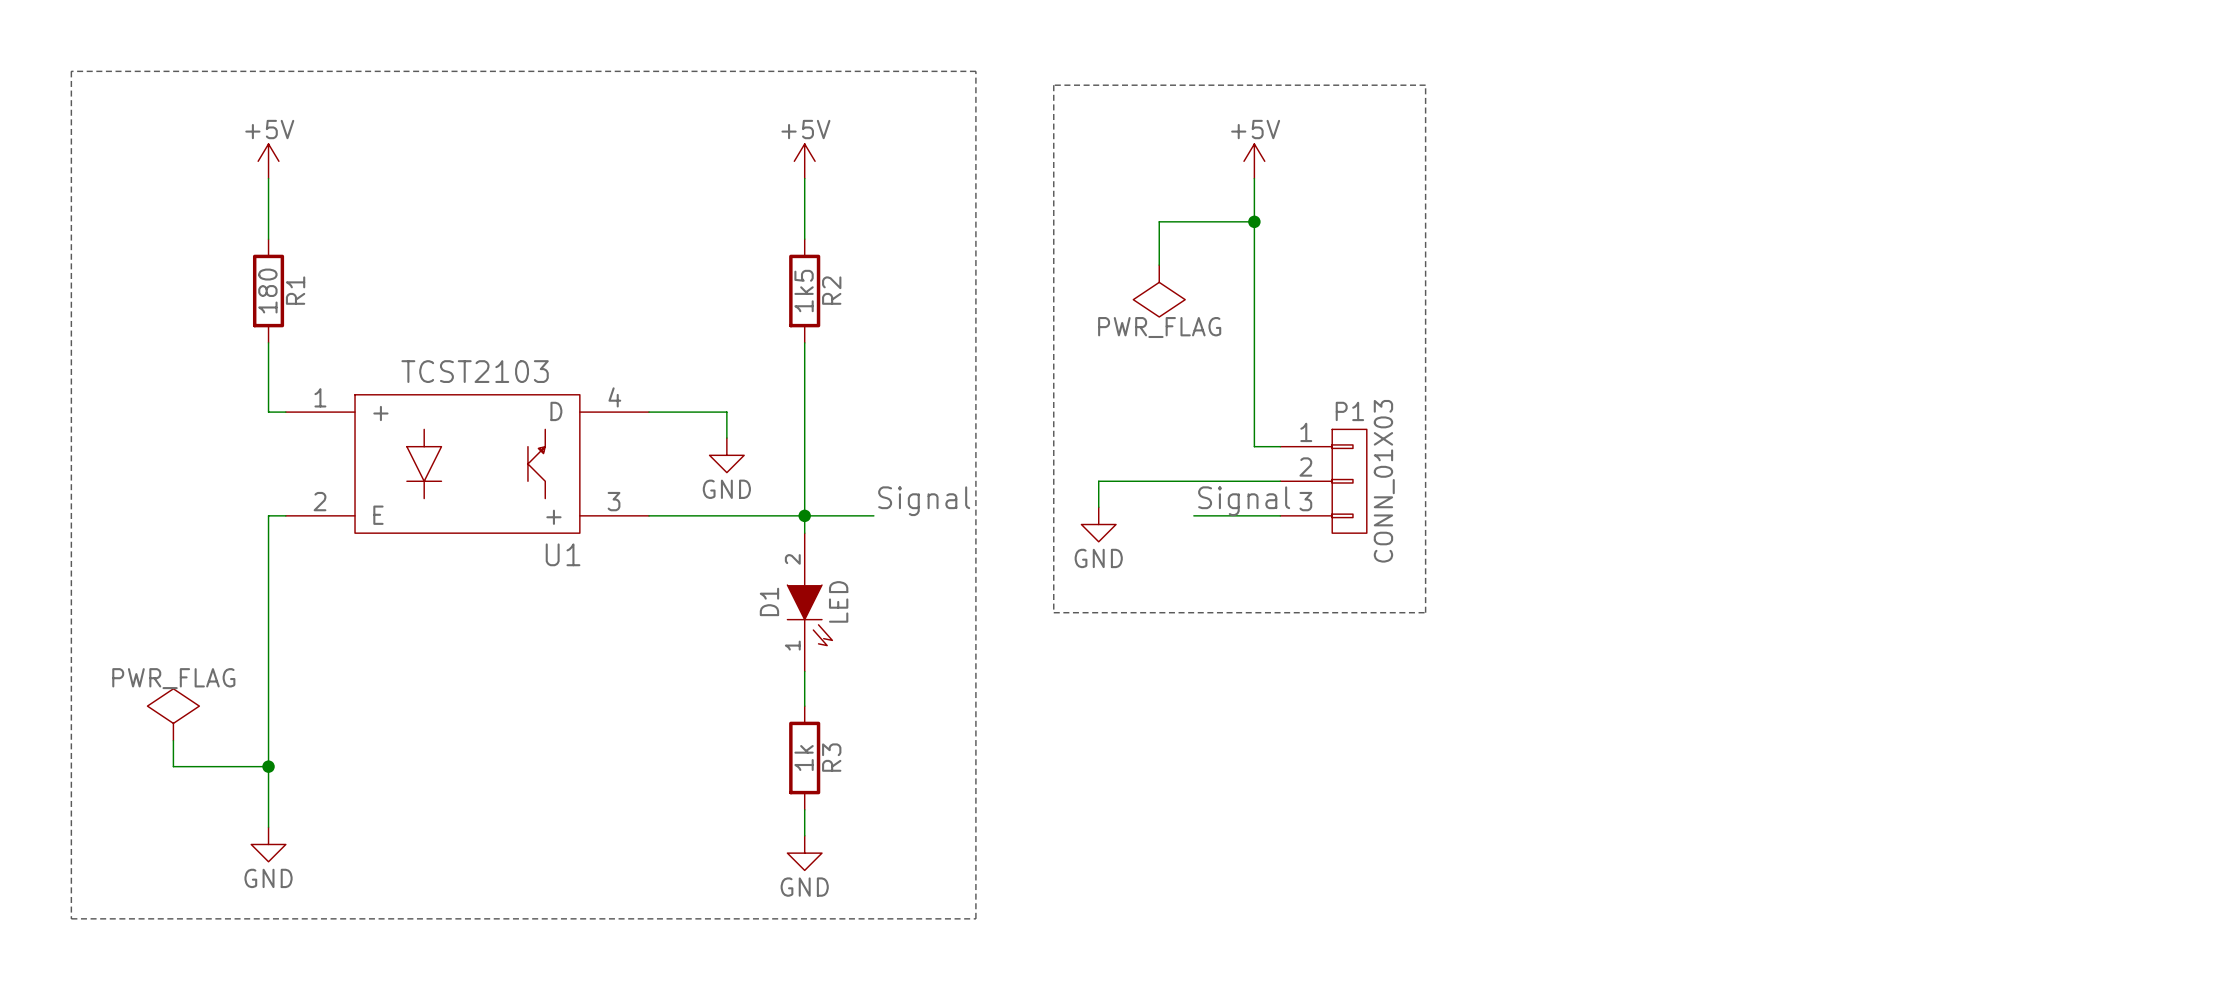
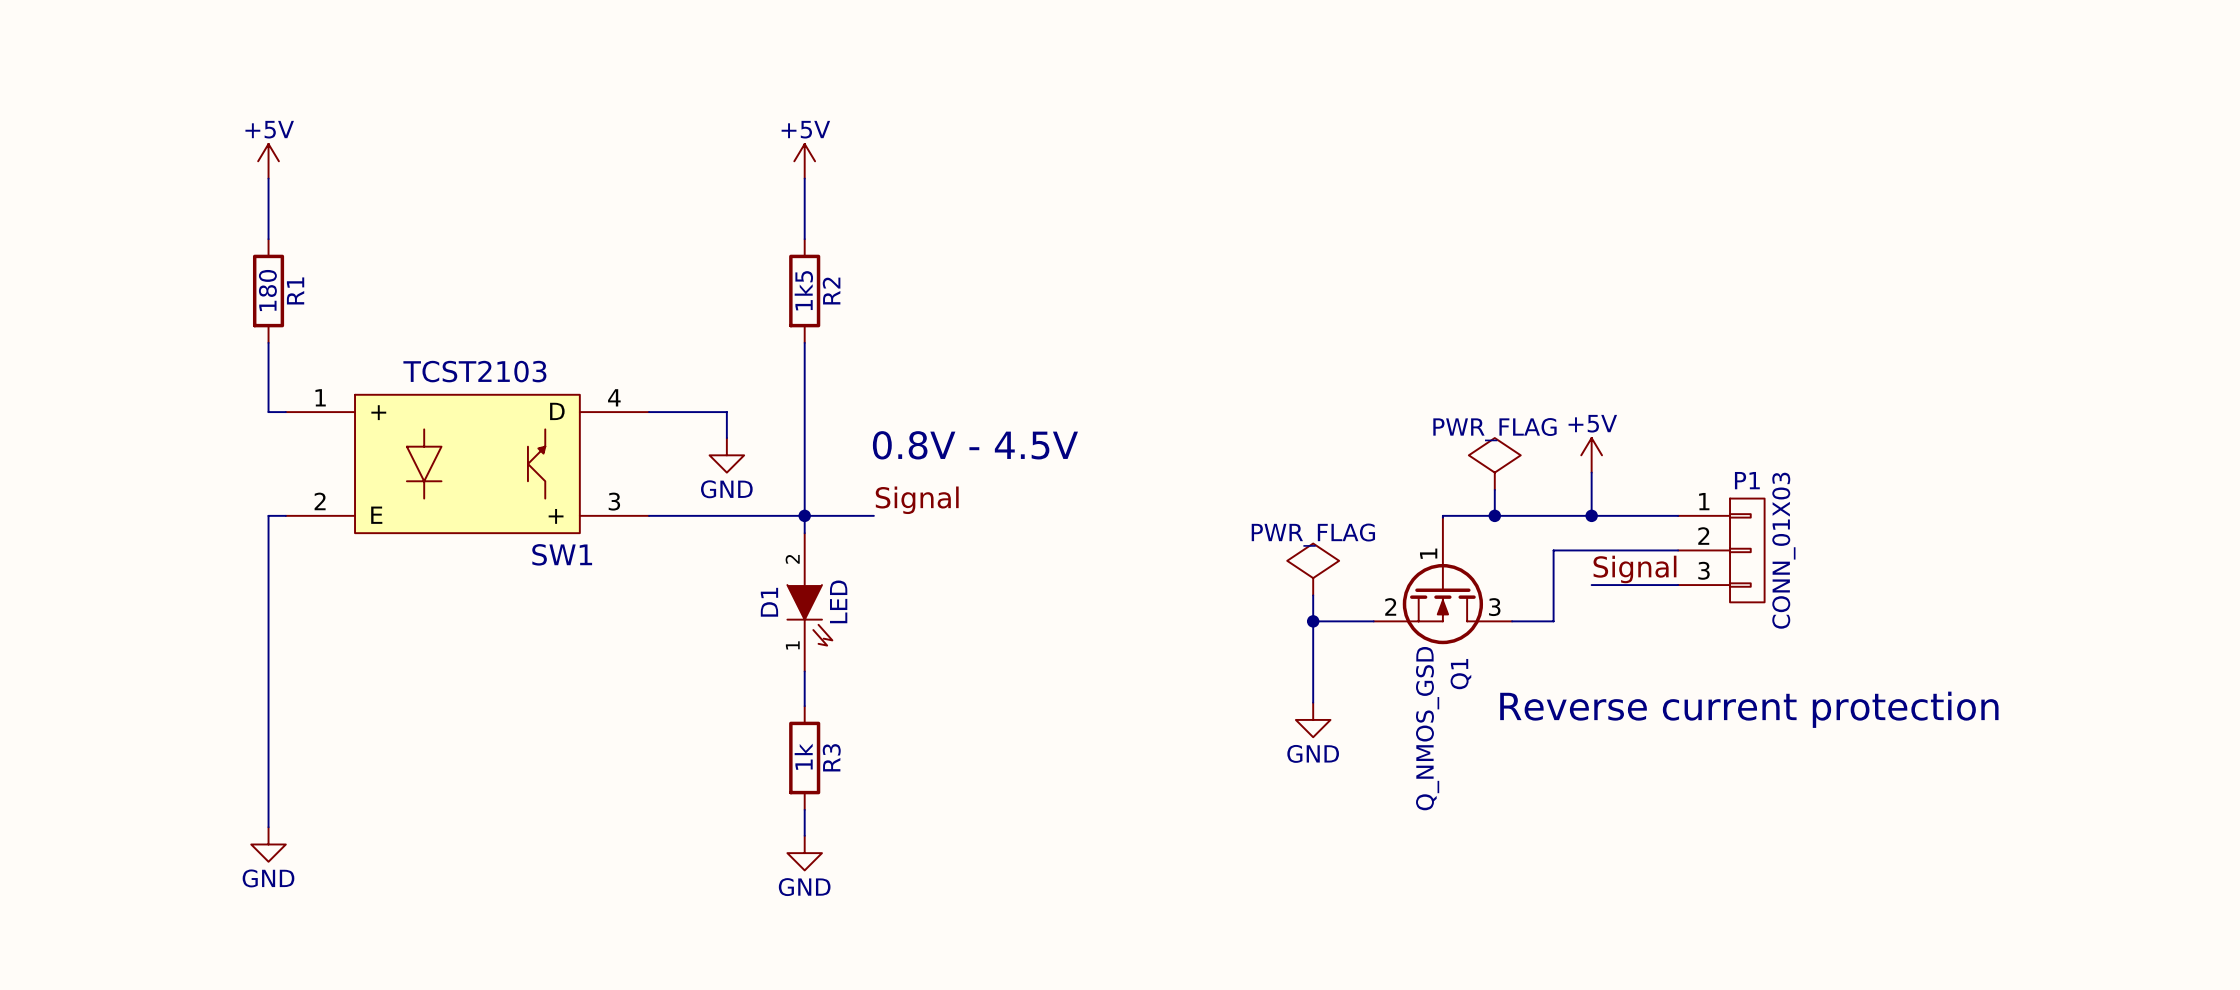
line: (71, 71) (71, 918) (975, 918) (975, 71) (71, 71) -> none
line: (1053, 85) (1053, 612) (1425, 612) (1425, 85) (1053, 85) -> none
power symbol: +5V (1254, 161) -> none
wire: (1254, 178) (1254, 446) (1280, 446) -> none
wire: (1254, 221) (1159, 221) (1159, 265) -> none
junction: (1254, 221) -> none
power symbol: PWR_FLAG (1159, 291) -> none
text: none -> 0.8V - 4.5V (975, 445)
power symbol: none -> +5V (1591, 455)
power symbol: none -> PWR_FLAG (1494, 463)
wire: none -> (1591, 472) (1591, 515)
wire: (1280, 481) (1098, 481) (1098, 507) -> none
P1 position: (1323, 481) -> (1721, 550)
wire: none -> (1494, 489) (1494, 515)
label: Signal (1244, 501) -> none
wire: (1193, 515) (1280, 515) -> none
junction: none -> (1494, 515)
junction: none -> (1591, 515)
wire: none -> (1678, 515) (1442, 515) (1442, 517)
power symbol position: GND (1098, 524) -> GND (1313, 719)
wire: none -> (1678, 550) (1553, 550) (1553, 621) (1512, 621)
U1 name: U1 (563, 554) -> SW1 (562, 554)
power symbol: none -> PWR_FLAG (1313, 569)
label: none -> Signal (1634, 569)
Q1: none -> Q_NMOS_GSD (1442, 580)
wire: none -> (1591, 585) (1678, 585)
wire: none -> (1313, 595) (1313, 702)
wire: none -> (1313, 621) (1373, 621)
junction: none -> (1313, 621)
text: none -> Reverse current protection (1749, 709)
power symbol: PWR_FLAG (173, 714) -> none
wire: (173, 740) (173, 766) (268, 766) -> none
junction: (268, 766) -> none

